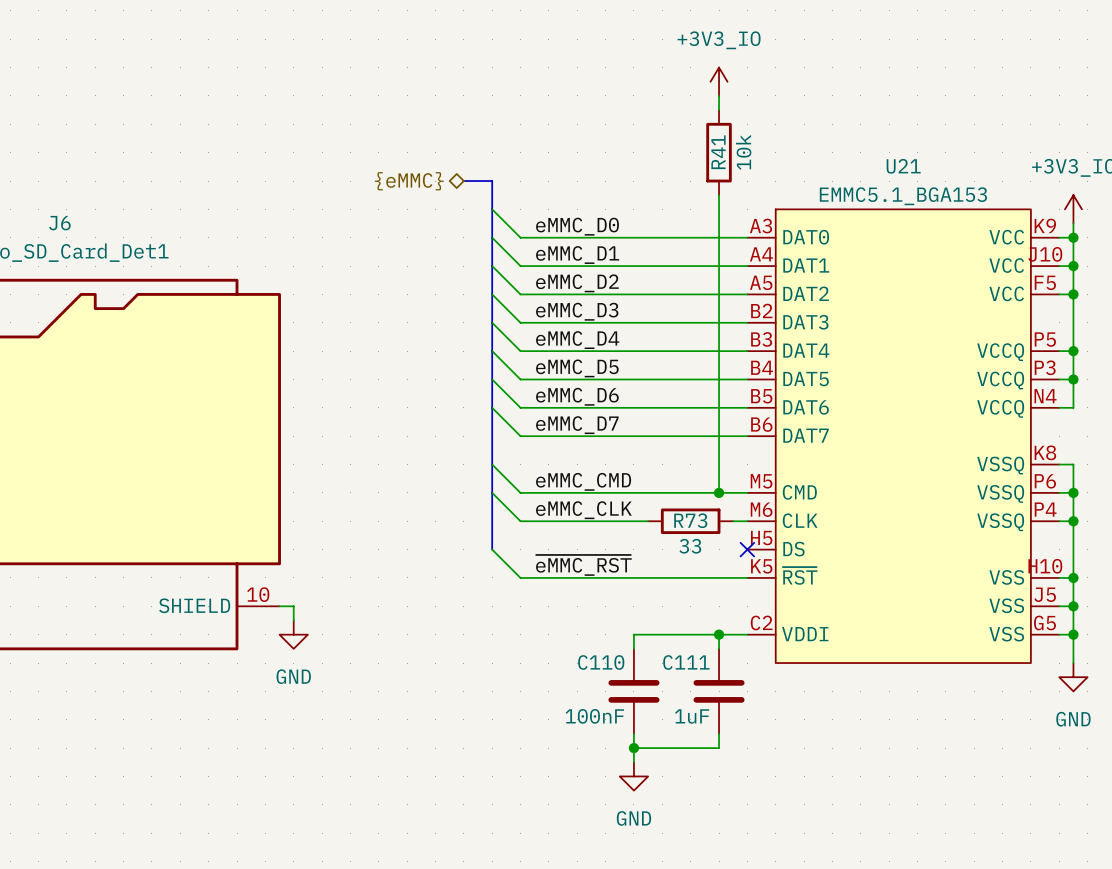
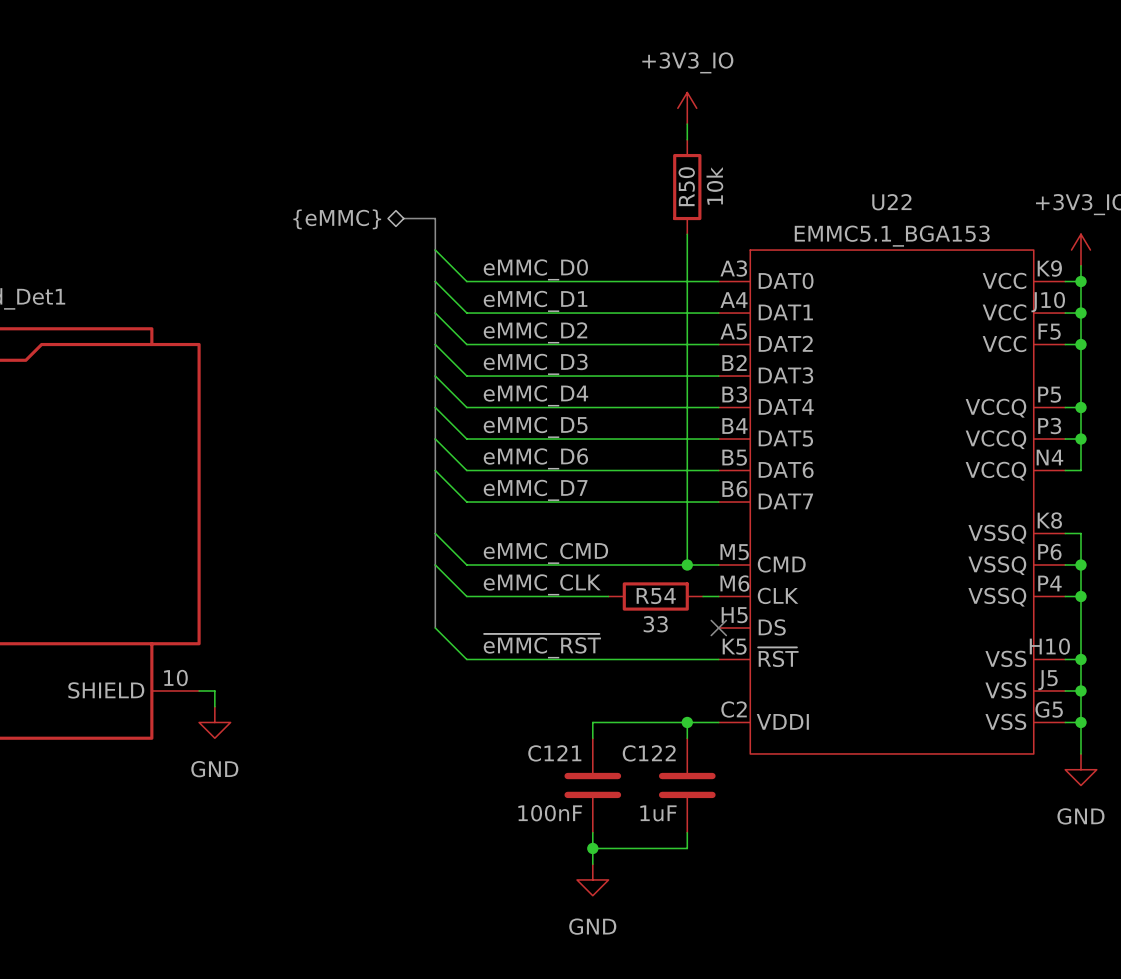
R41 name: R41 (718, 152) -> R50 (686, 186)
U21 name: U21 (903, 166) -> U22 (891, 202)
R73 name: R73 (690, 520) -> R54 (656, 596)
C110 name: C110 (601, 662) -> C121 (554, 753)
C111 name: C111 (686, 662) -> C122 (649, 753)

